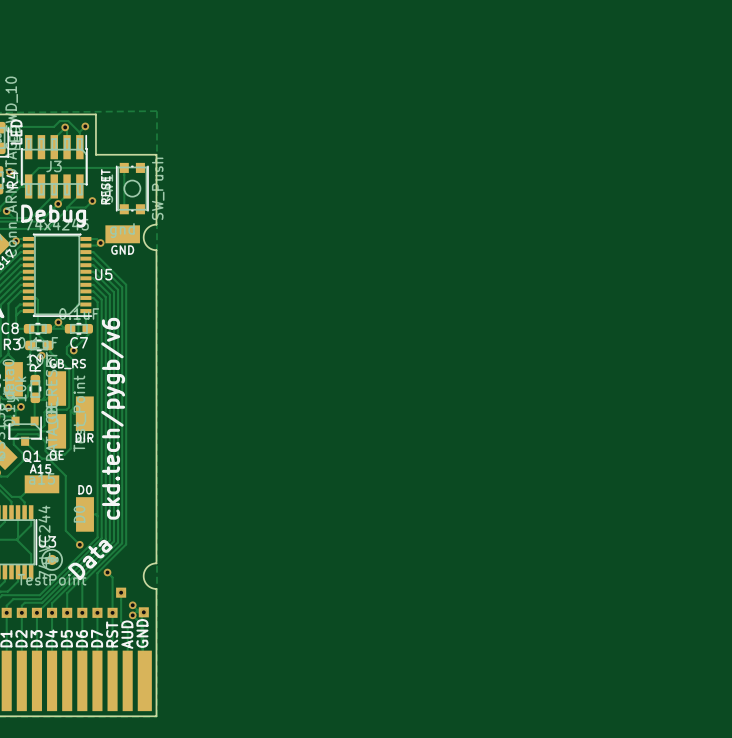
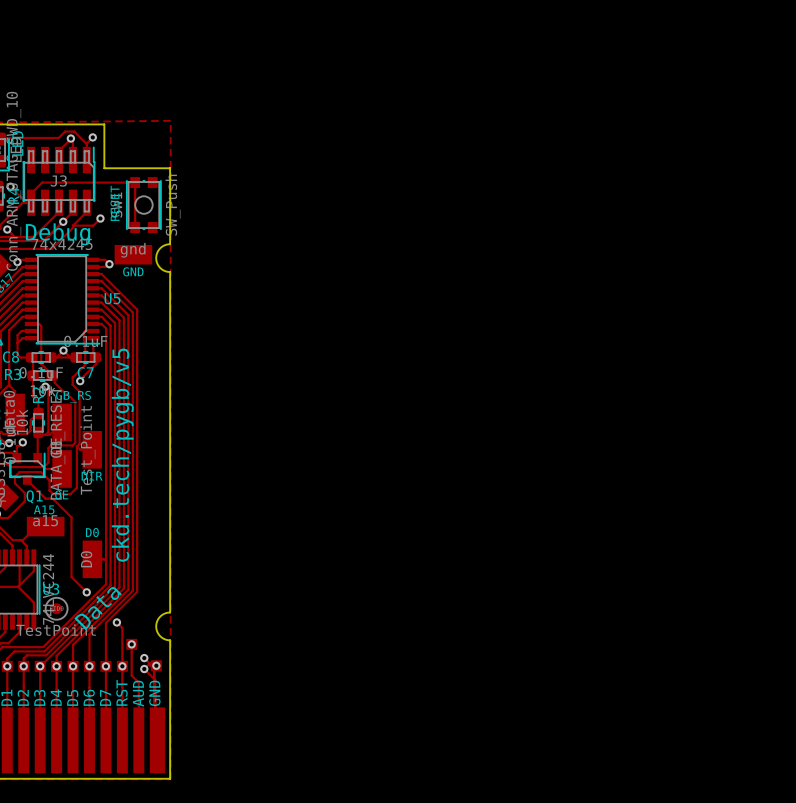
text: ckd.tech/pygb/v6 (113, 418) -> ckd.tech/pygb/v5 (122, 455)

